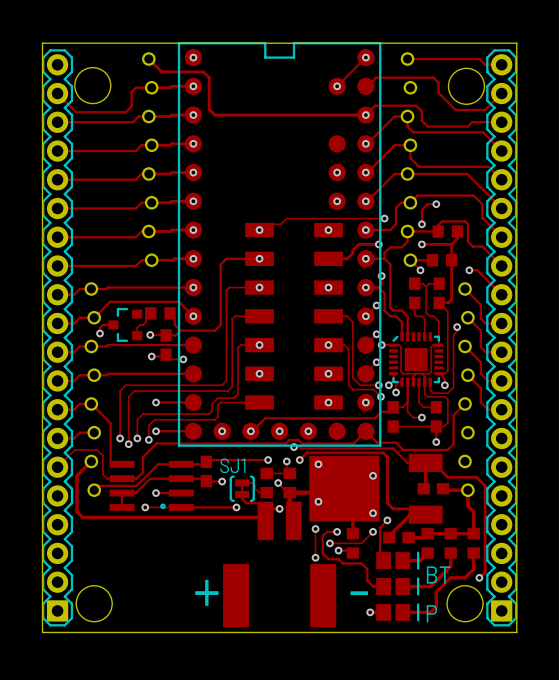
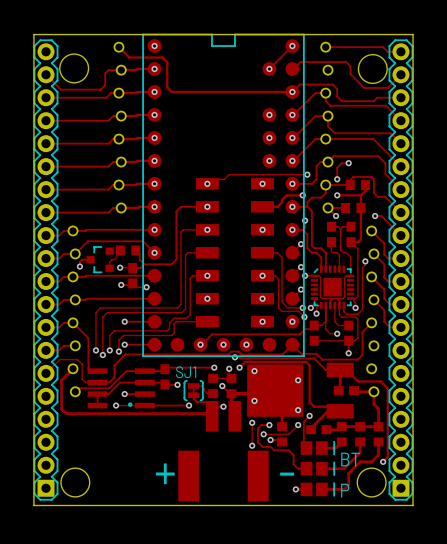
via: none -> (269, 114)
via: (365, 316) -> none
via: (222, 431) -> none

